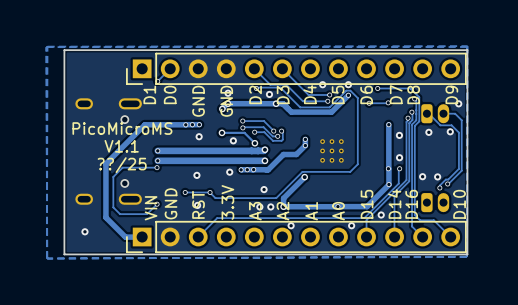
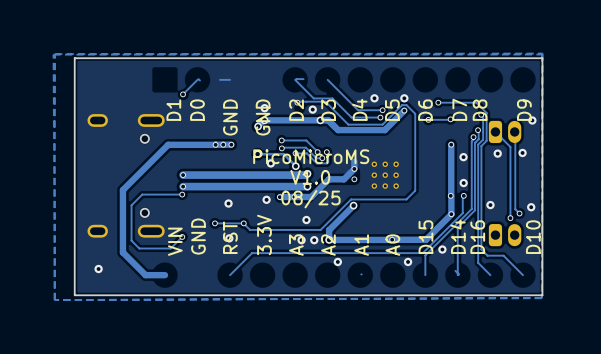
part: (296, 68) -> none
track: (426, 113) (440, 125) (451, 125) (458, 132) (458, 168) (439, 185) -> (495, 131) (510, 146) (510, 215)
track: (443, 113) (455, 113) (461, 120) (461, 170) (447, 183) -> (514, 131) (515, 209) (519, 213)
text position: PicoMicroMS (122, 128) -> PicoMicroMS (311, 156)
via: (199, 136) -> none
via position: (305, 139) -> (354, 179)
text: V1.1 (121, 146) -> none
text: none -> V1.0 (310, 177)
text: ??/25 (122, 165) -> none
via: (247, 169) -> none
text: none -> 08/25 (310, 199)
via position: (437, 176) -> (531, 207)
part: (296, 236) -> none

